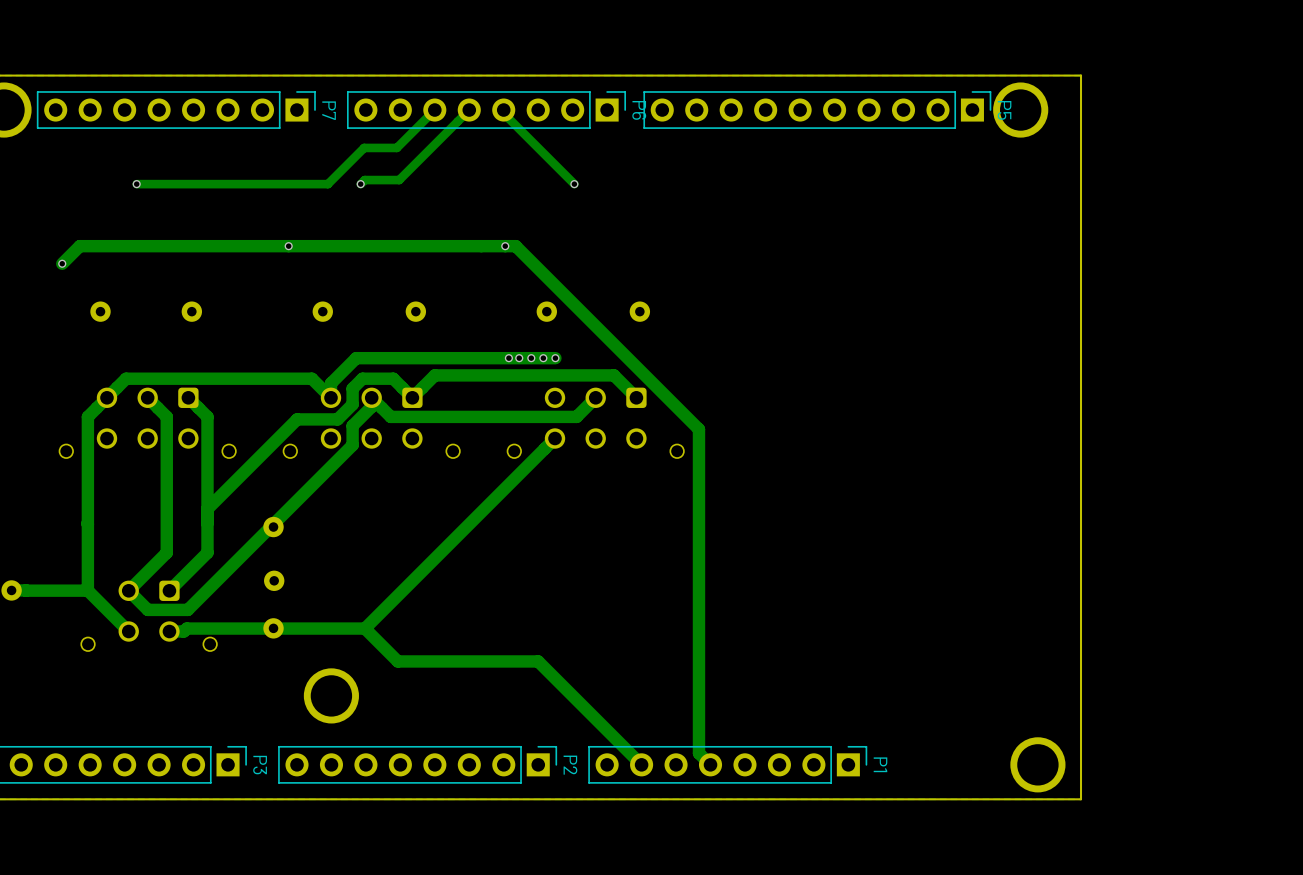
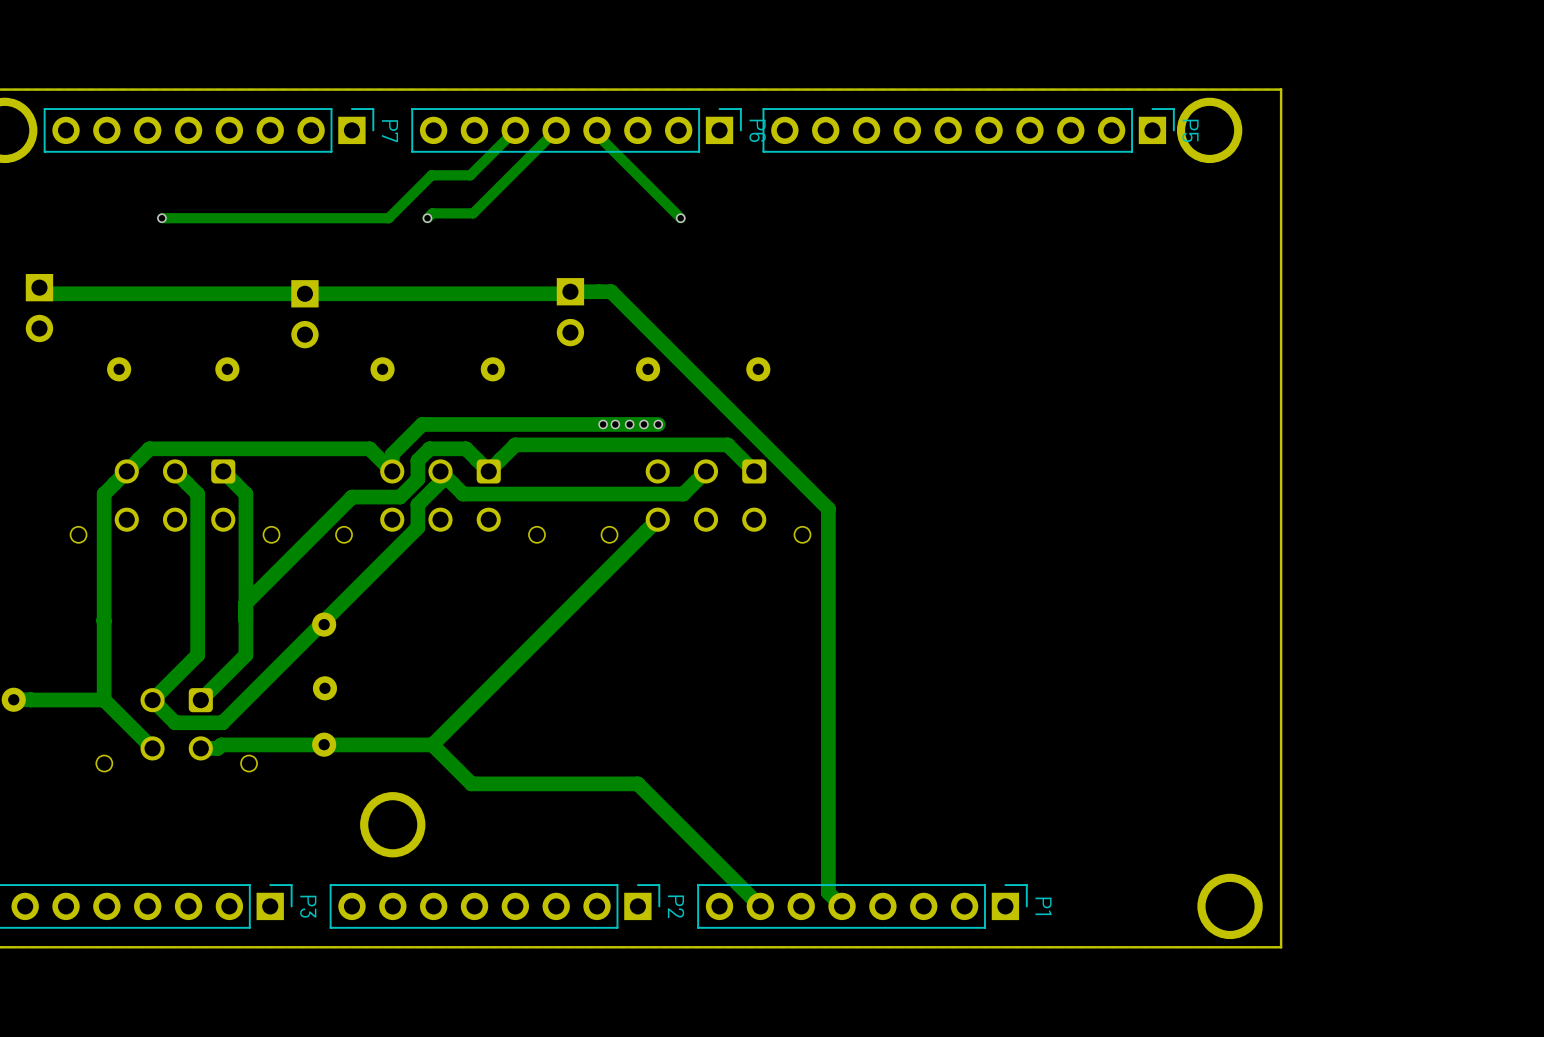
via: (288, 246) -> none
track: (481, 246) (79, 246) (62, 263) -> (570, 291) (568, 293) (45, 293) (39, 287)
via: (505, 246) -> none
part: none -> (39, 308)
via: (62, 263) -> none
part: none -> (570, 312)
part: none -> (304, 314)

